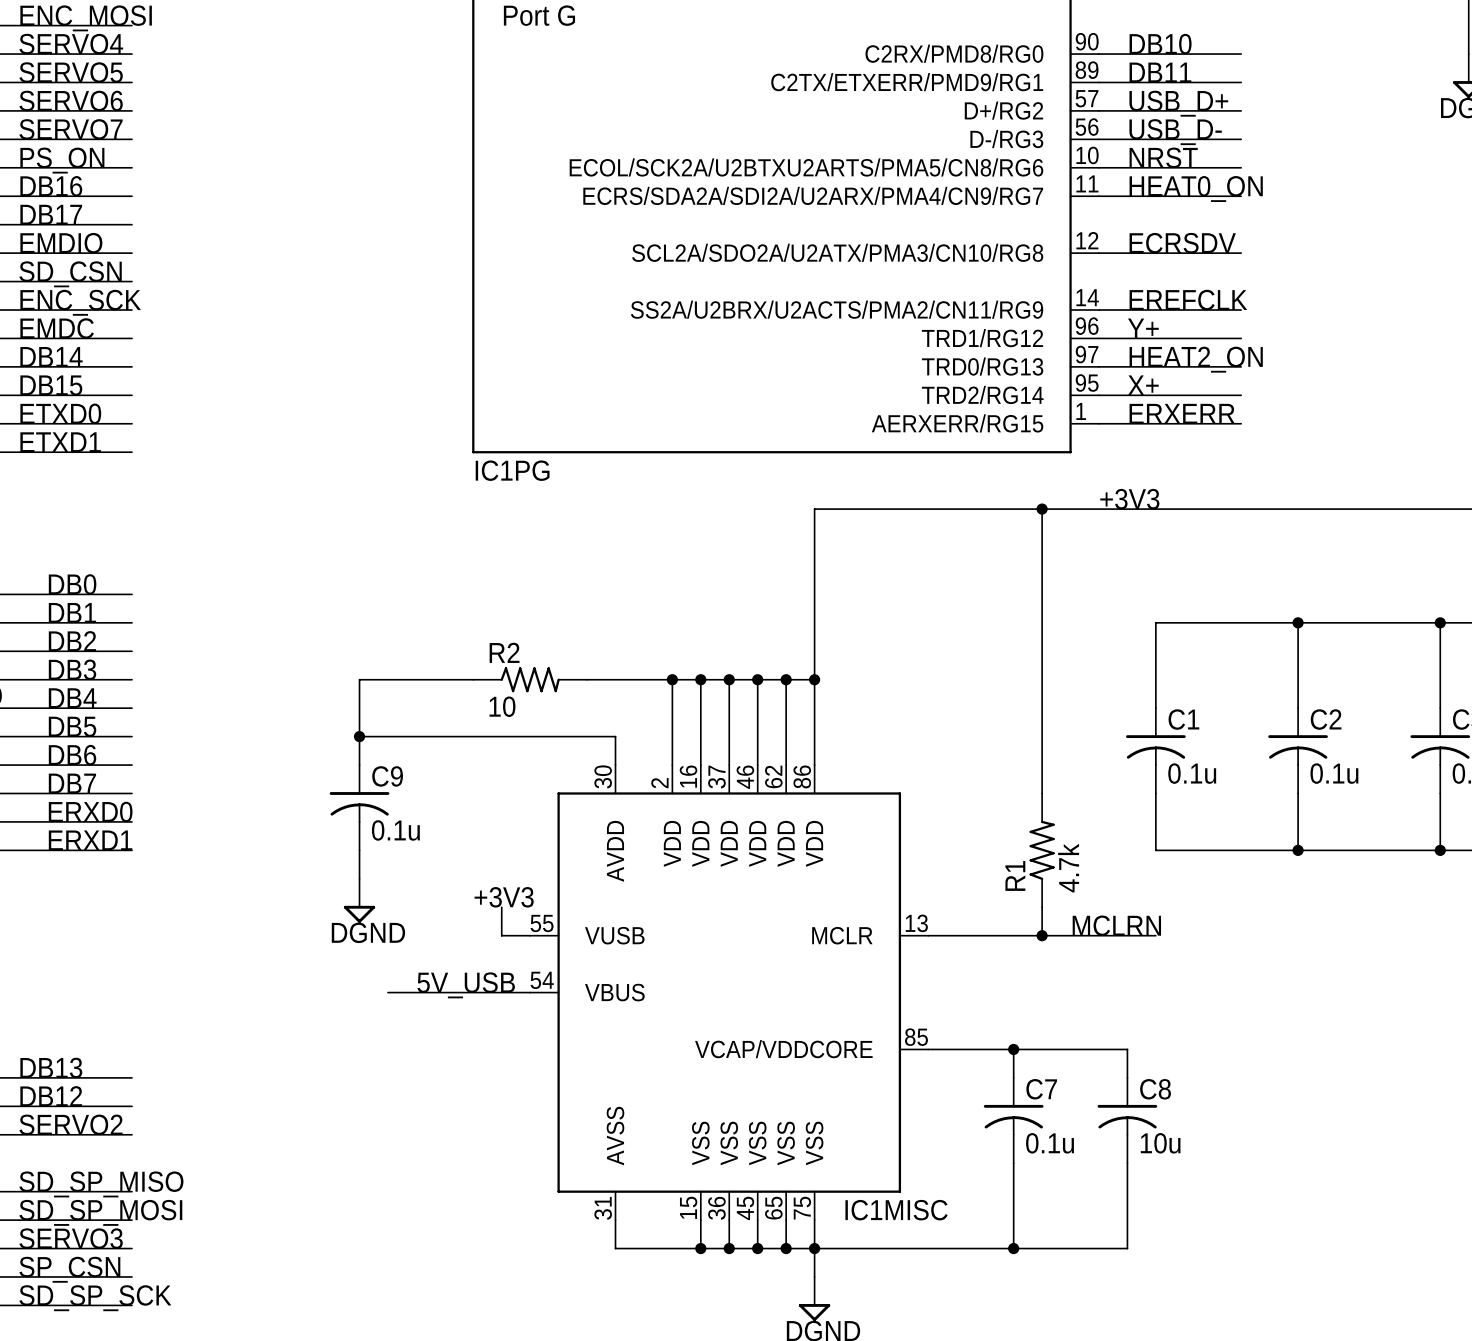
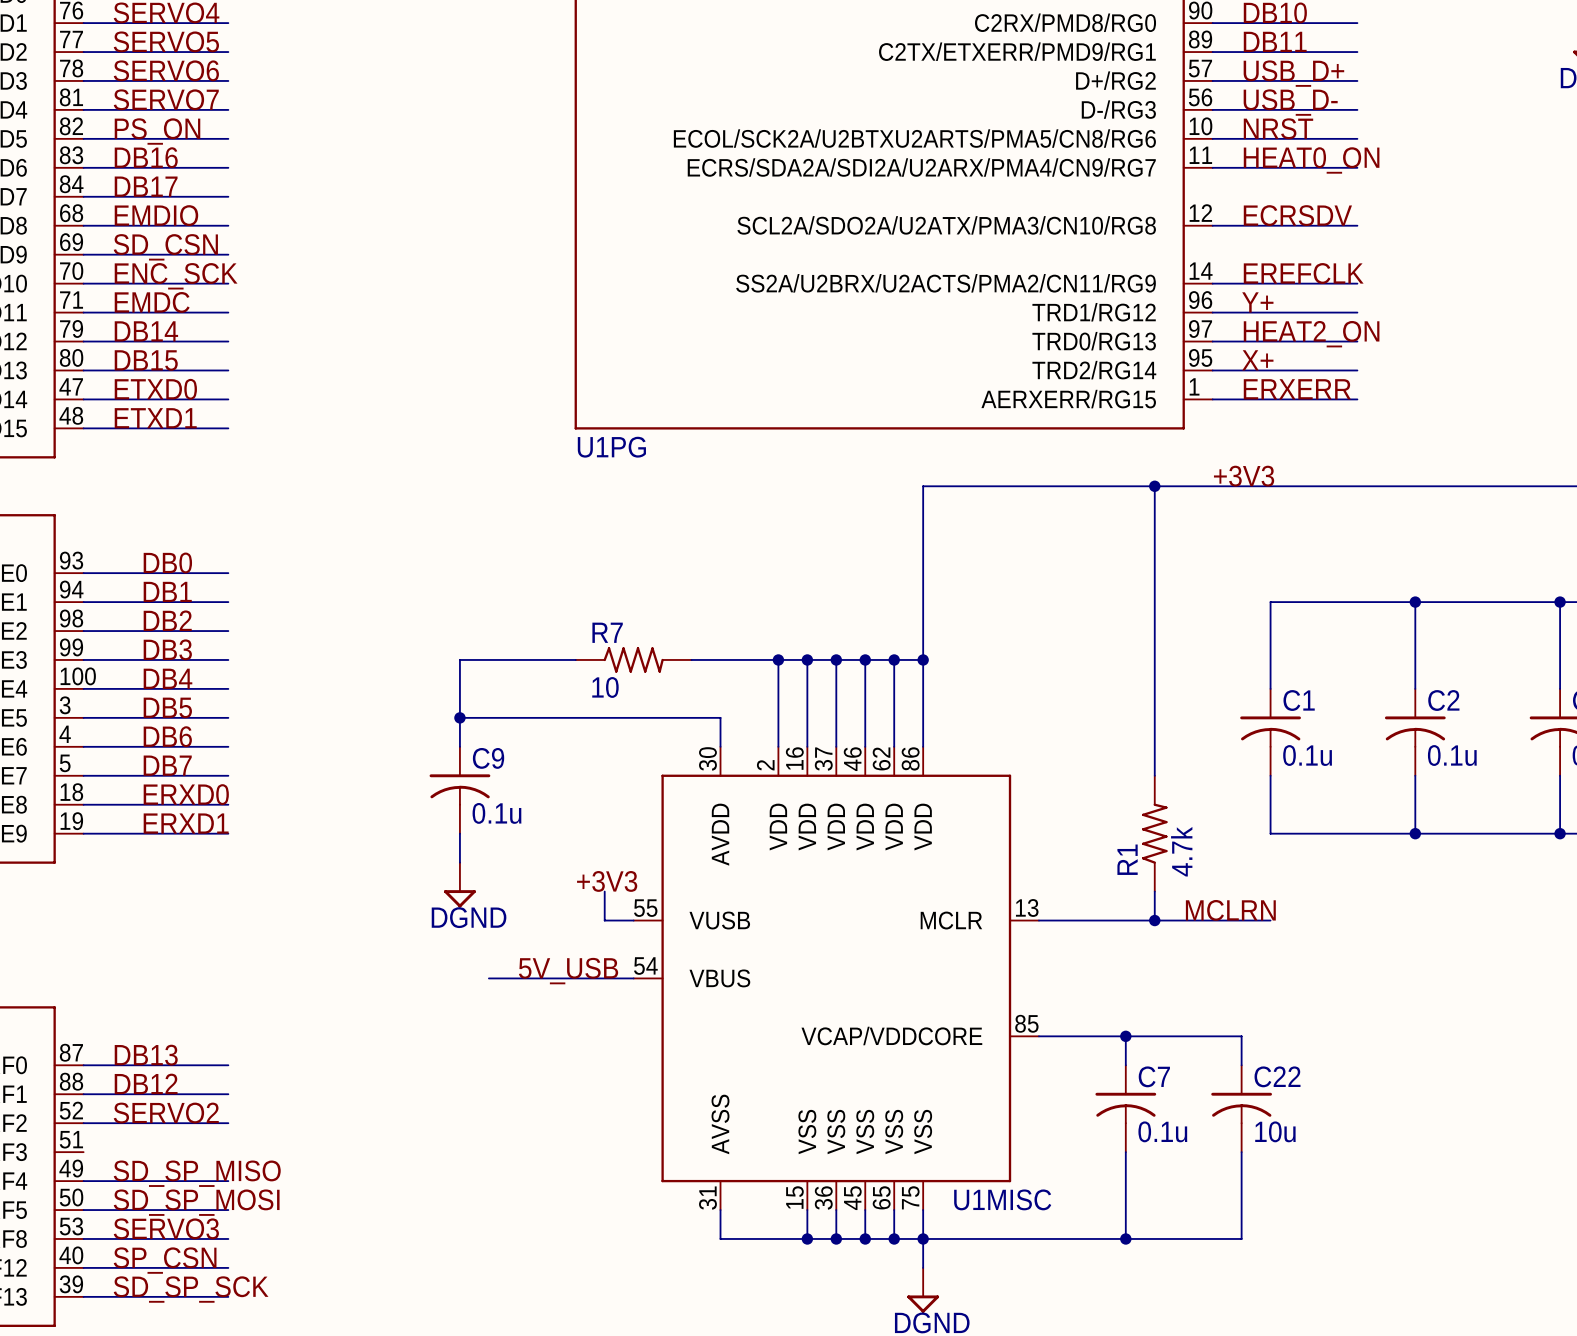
IC1PG name: IC1PG (512, 470) -> U1PG (611, 447)
R2 name: R2 (504, 652) -> R7 (607, 632)
C8 name: C8 (1155, 1089) -> C22 (1277, 1076)
IC1MISC name: IC1MISC (896, 1210) -> U1MISC (1002, 1199)

